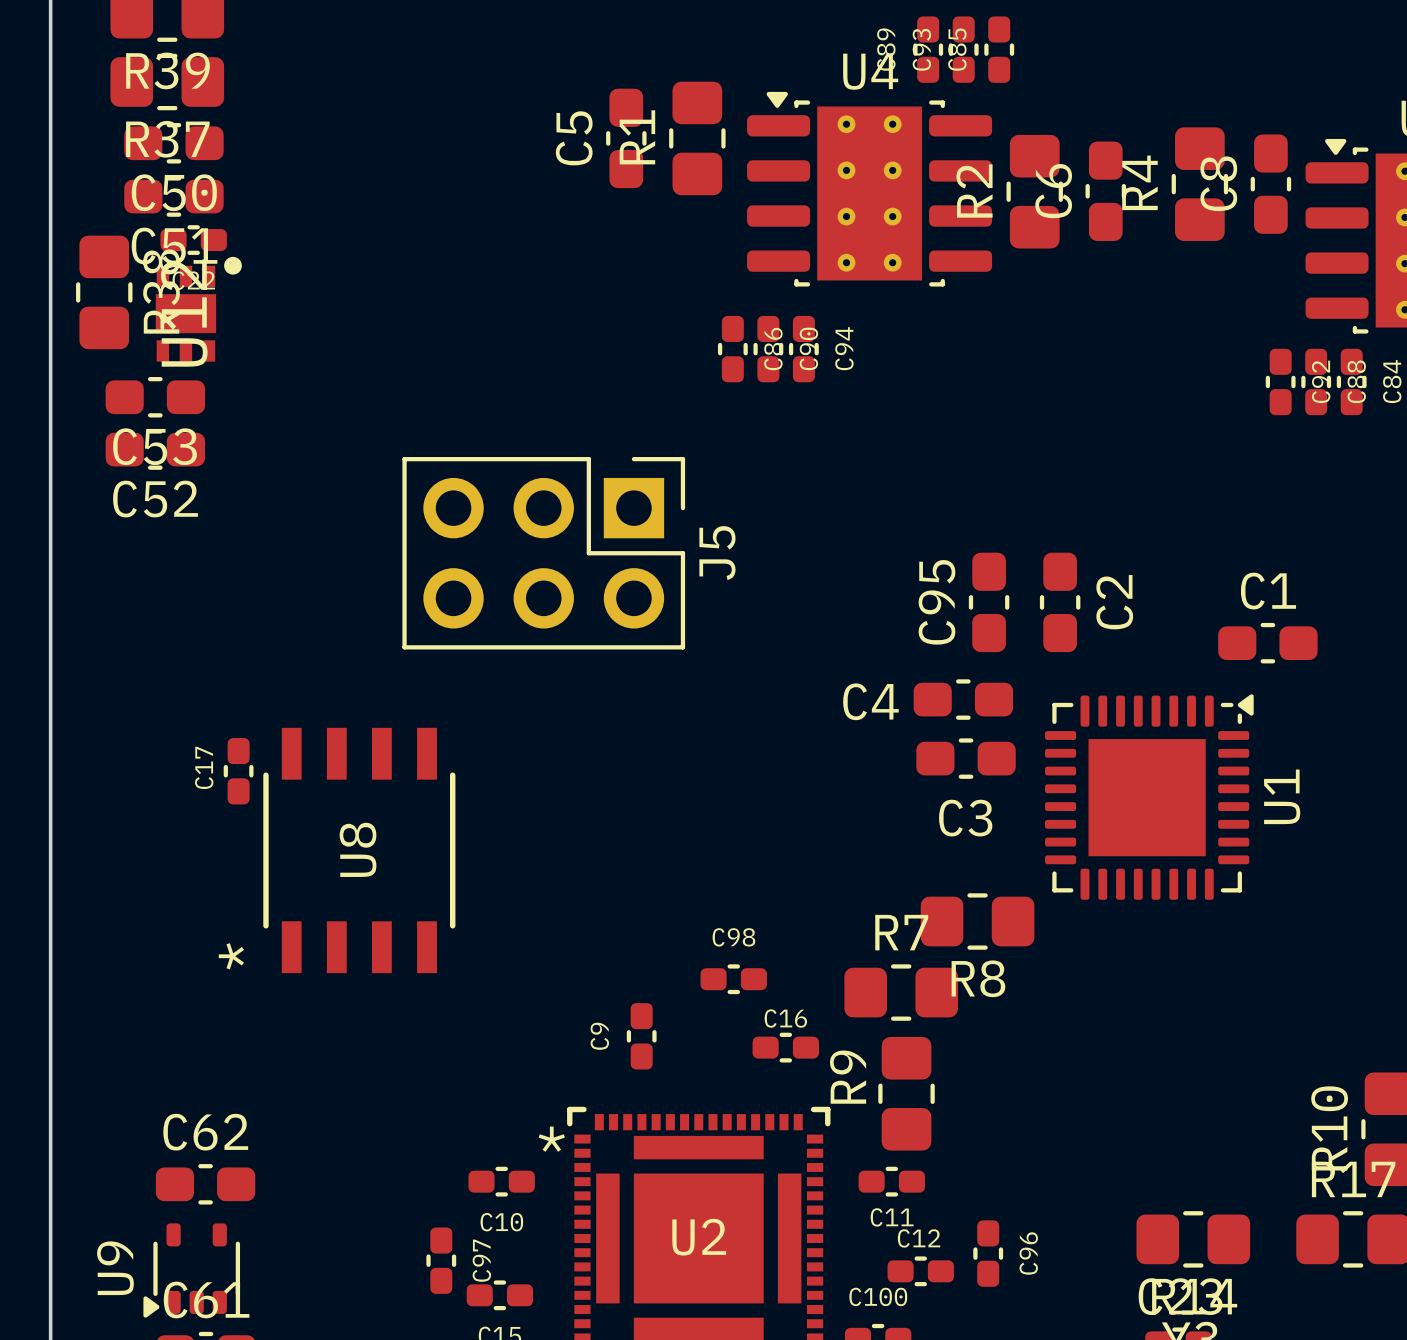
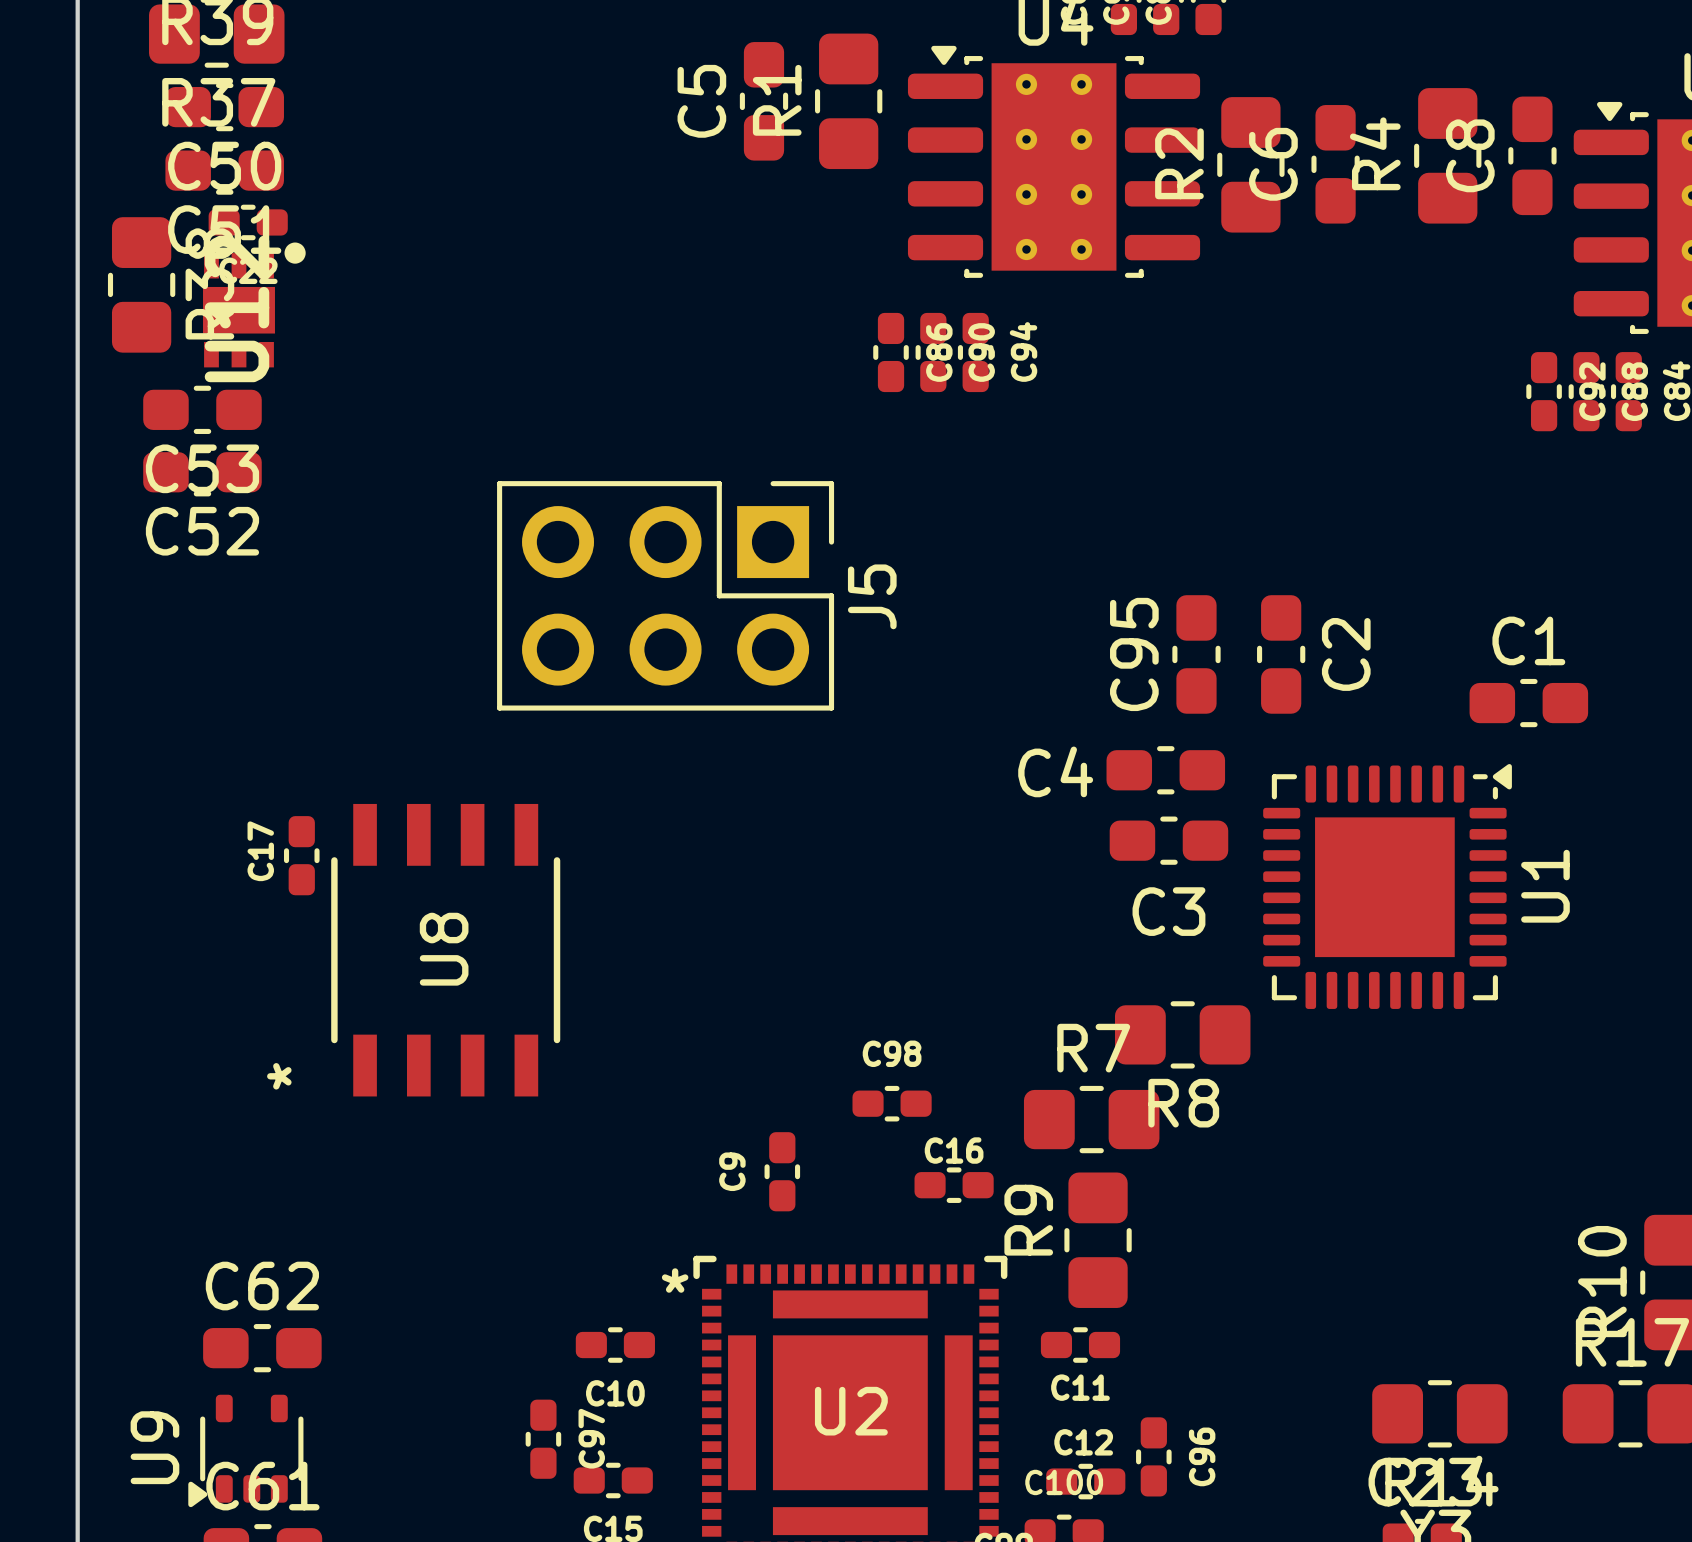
C96 position: (988, 1253) -> (1153, 1456)
C12 position: (920, 1271) -> (1085, 1481)

